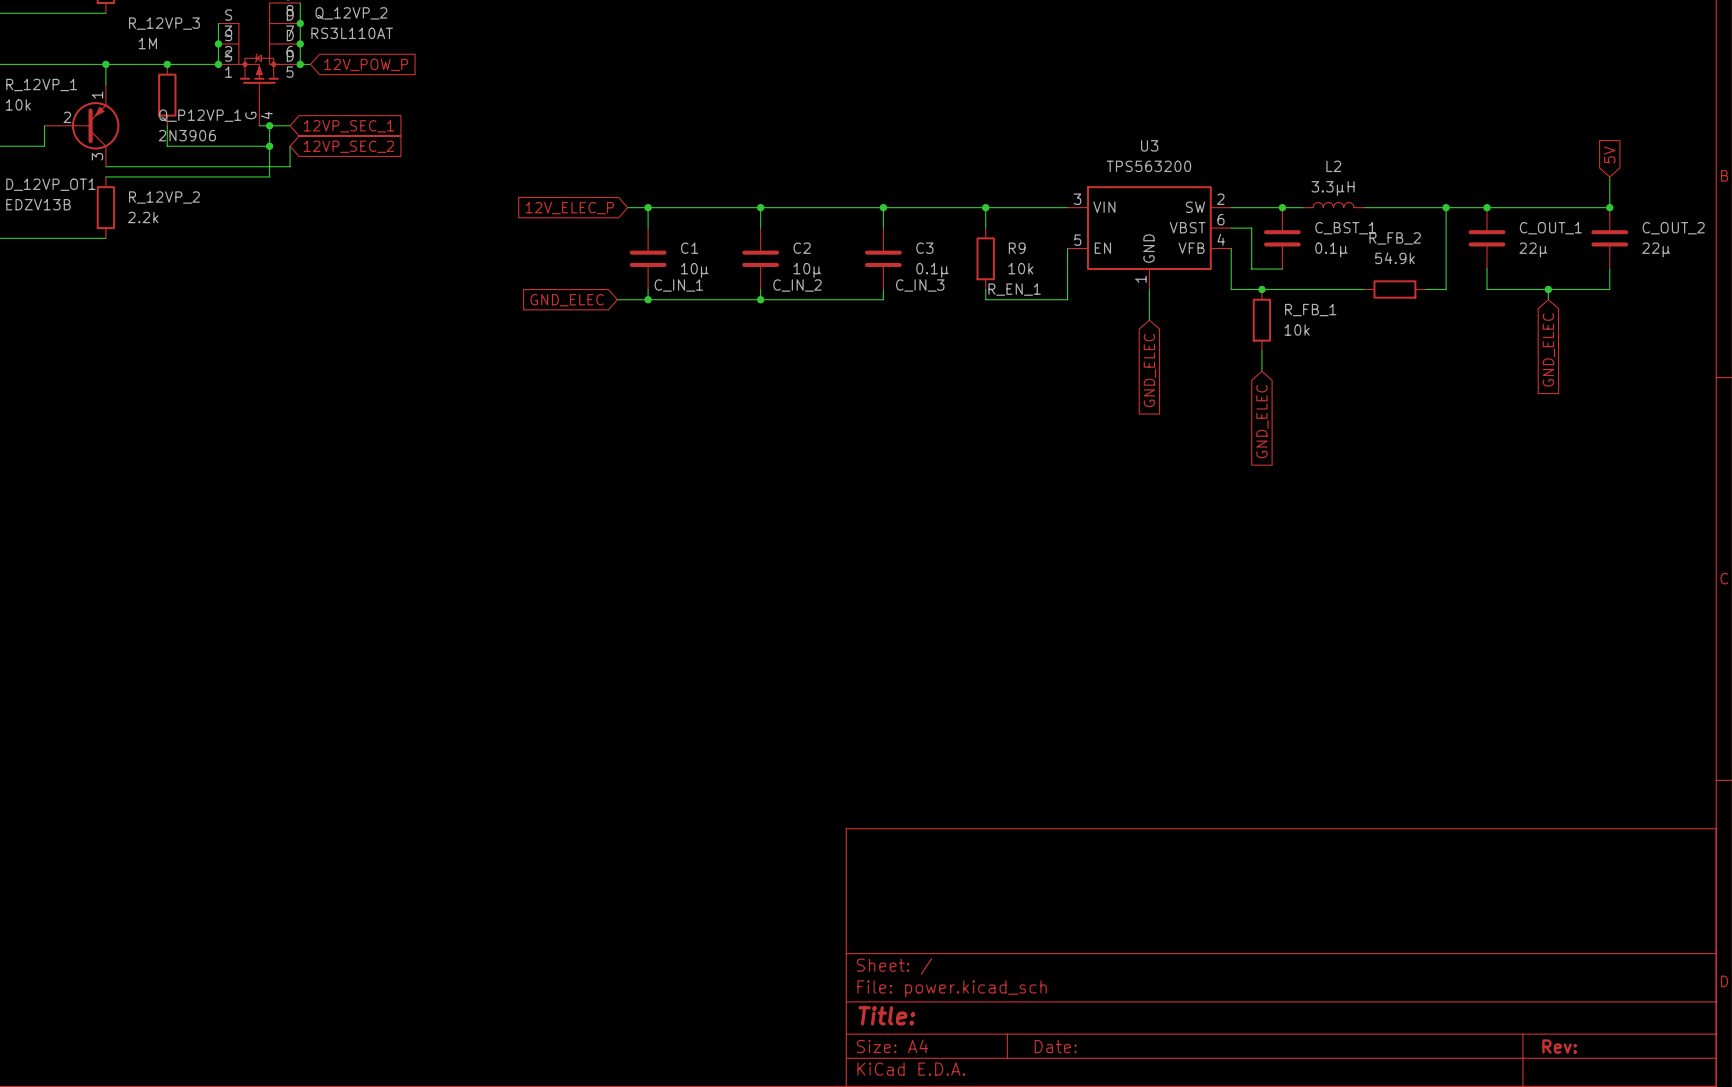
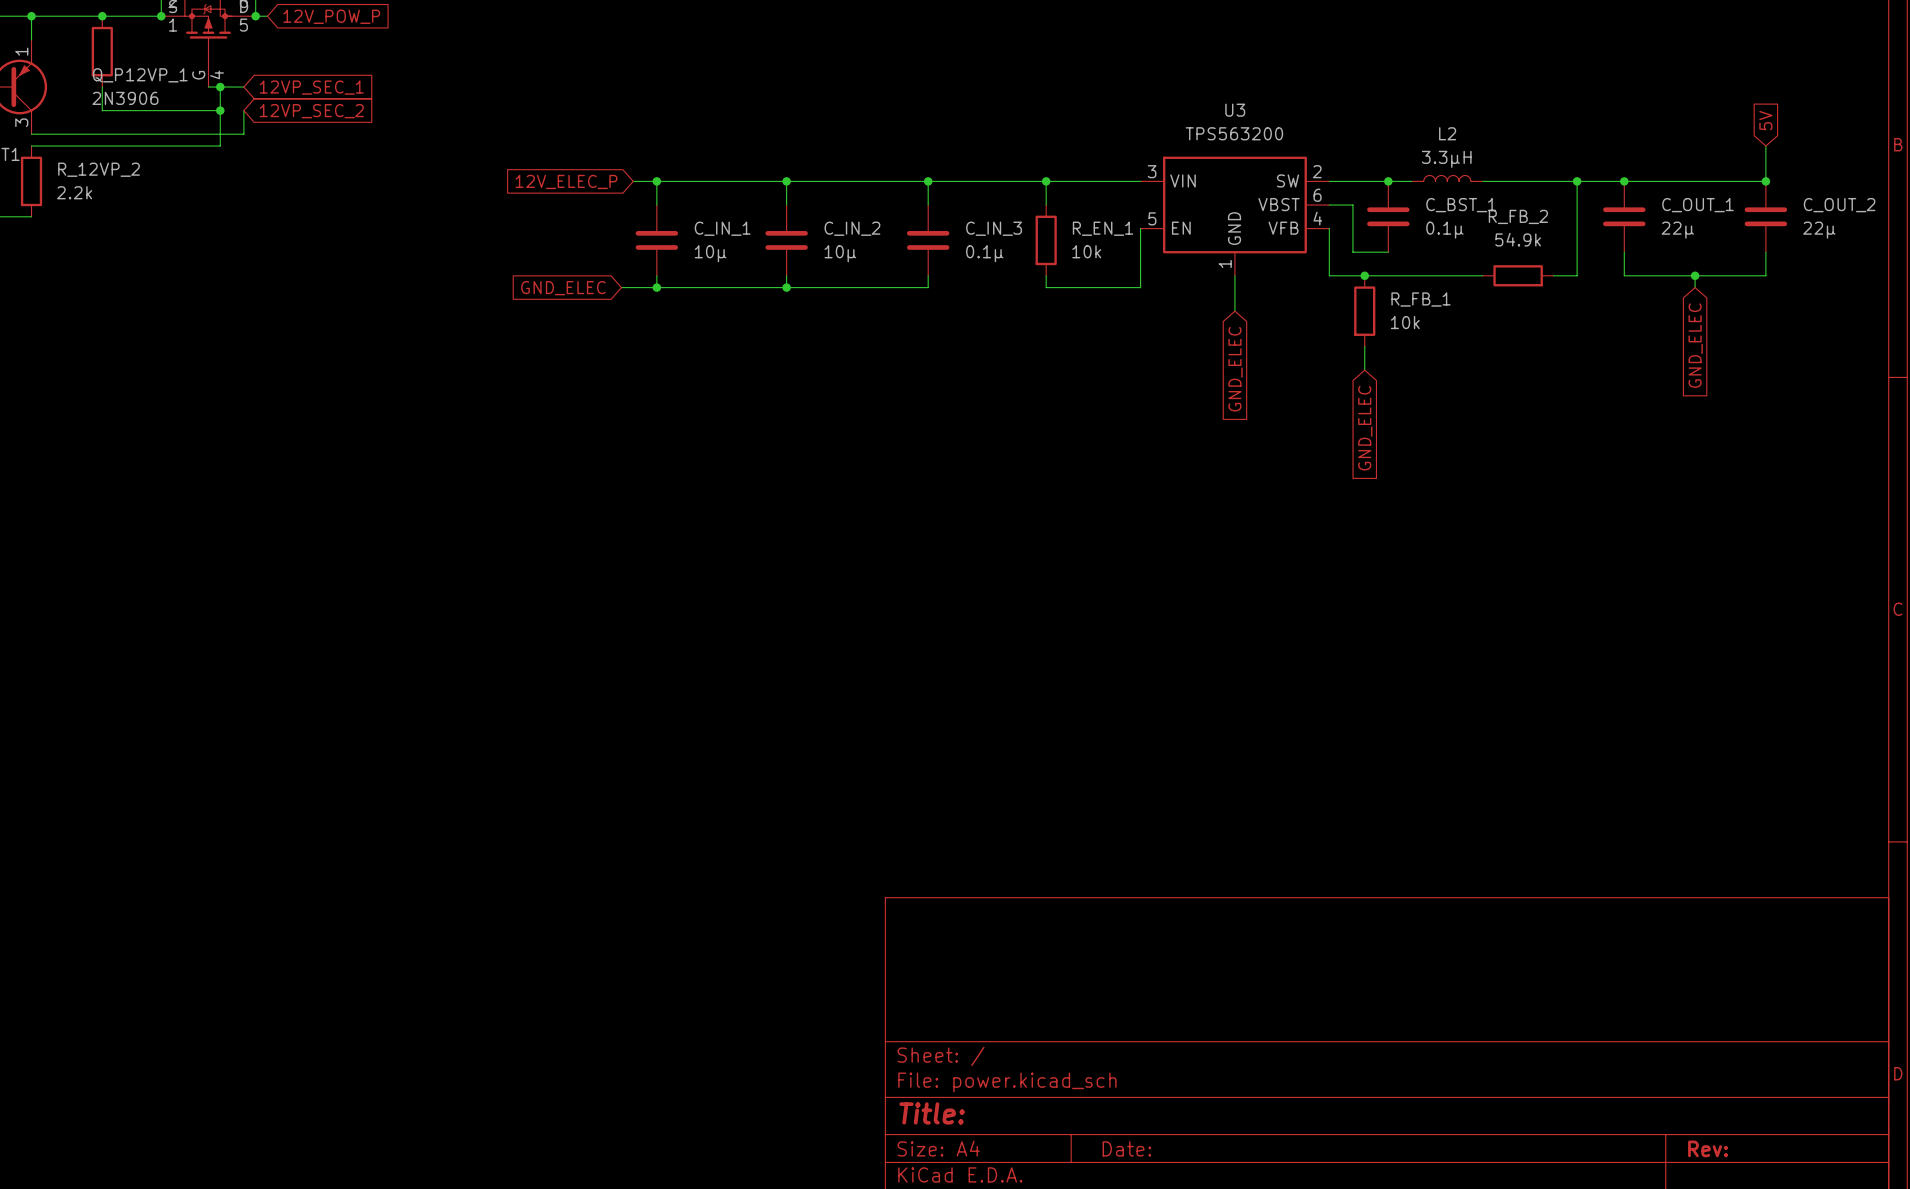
C1 name: C1 (689, 248) -> C_IN_1 (722, 228)
C2 name: C2 (802, 248) -> C_IN_2 (852, 228)
C3 name: C3 (924, 248) -> C_IN_3 (994, 228)
R9 name: R9 (1017, 248) -> R_EN_1 (1103, 228)
C1 text: C_IN_1 (678, 285) -> none
C2 text: C_IN_2 (797, 285) -> none
C3 text: C_IN_3 (920, 285) -> none
R9 text: R_EN_1 (1014, 289) -> none

